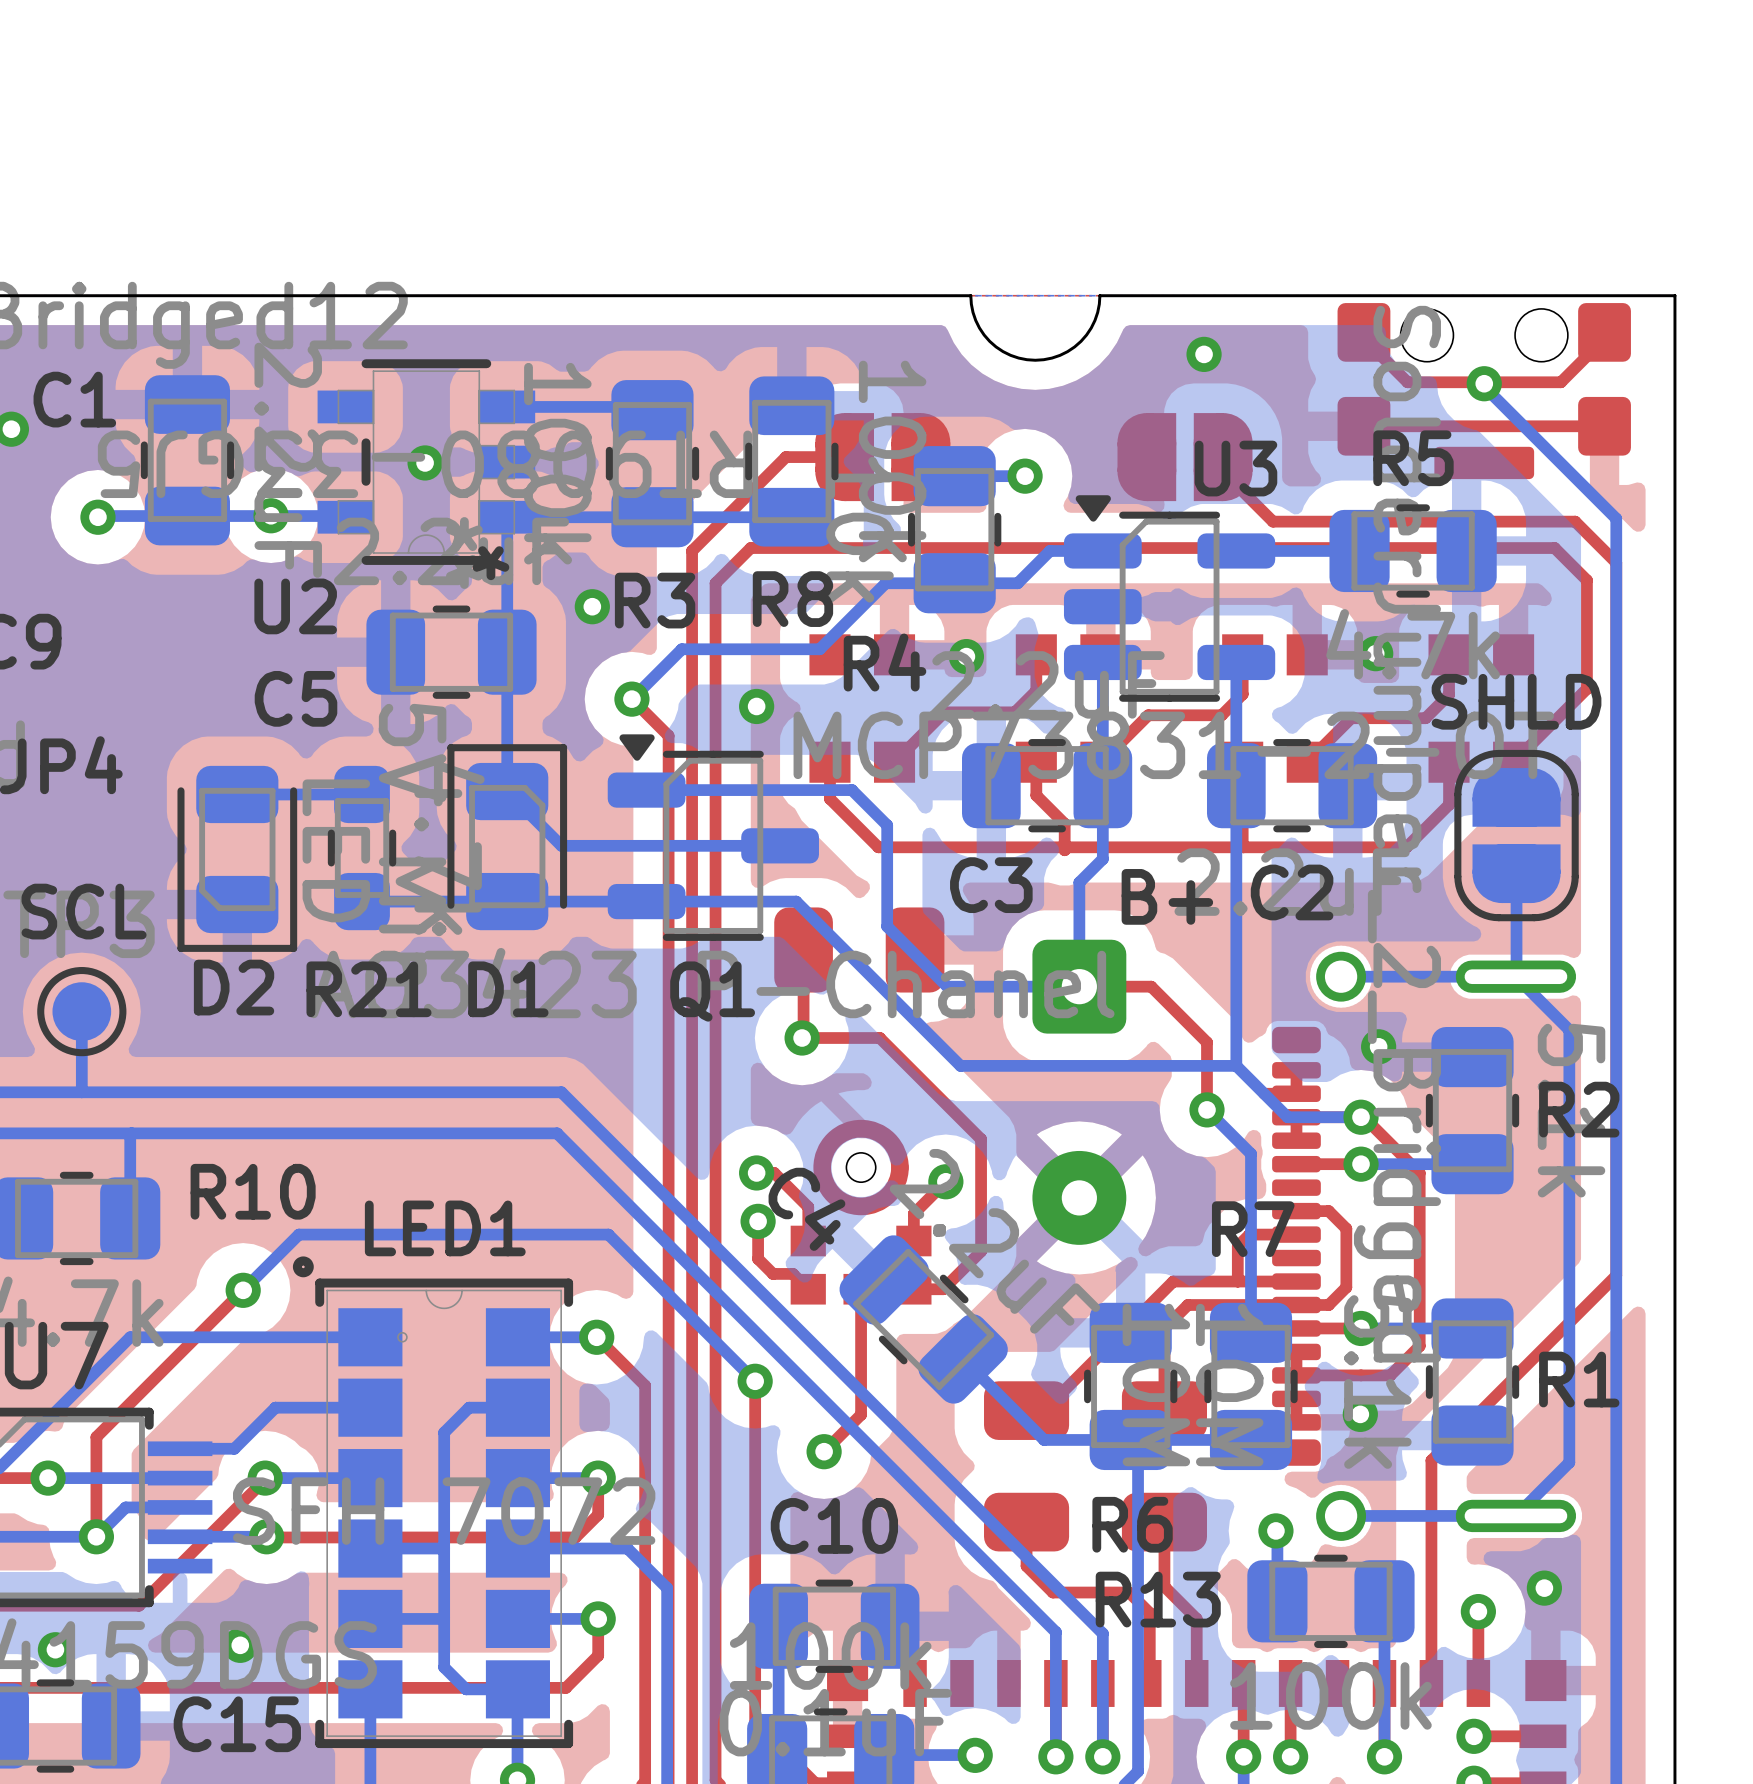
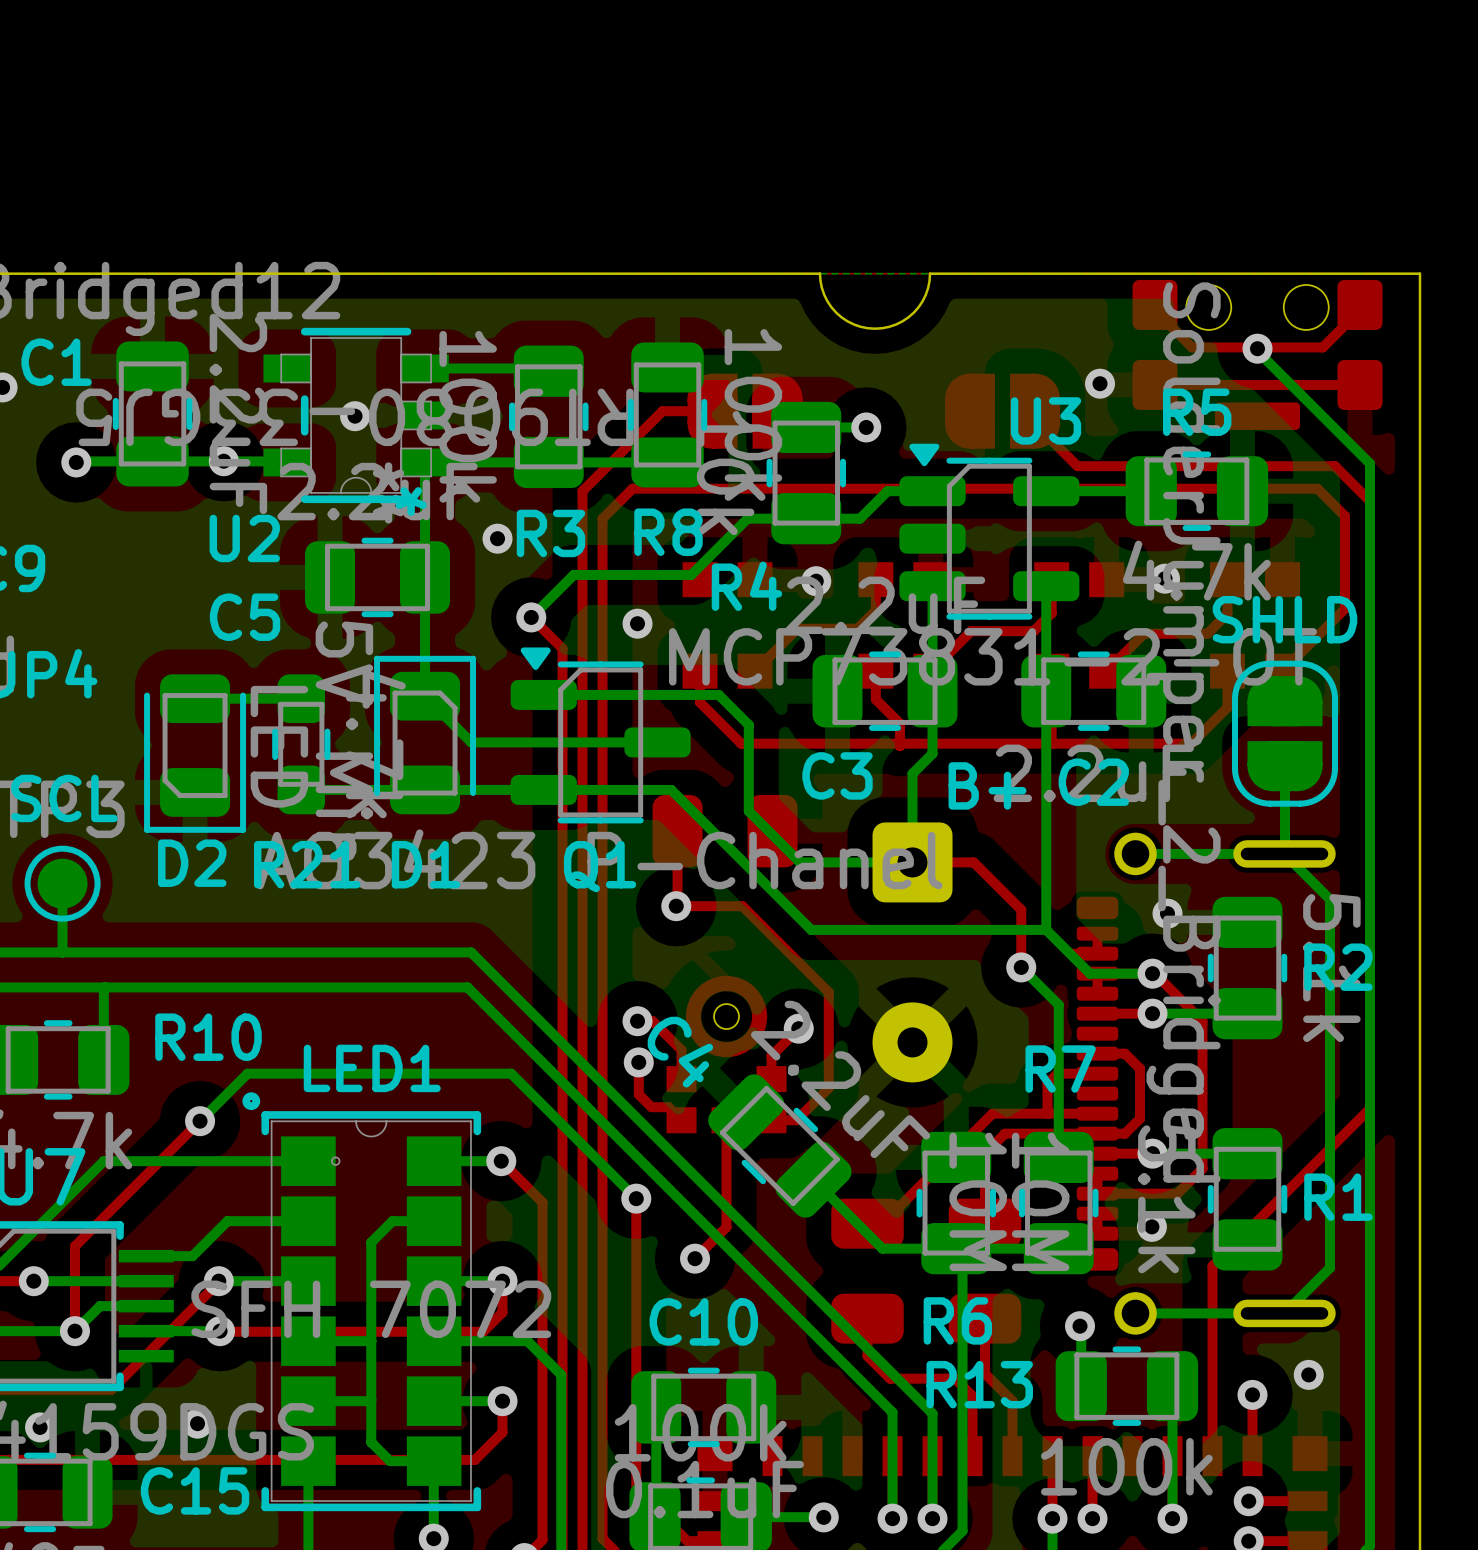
via position: (1204, 354) -> (1100, 383)

